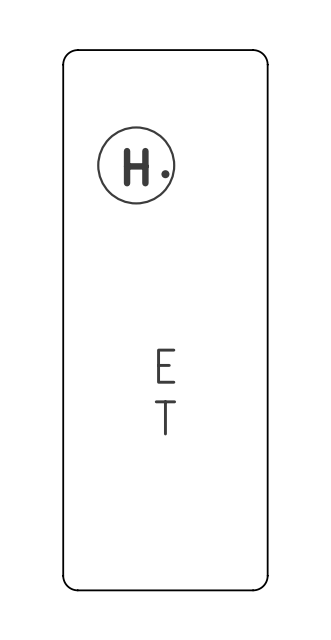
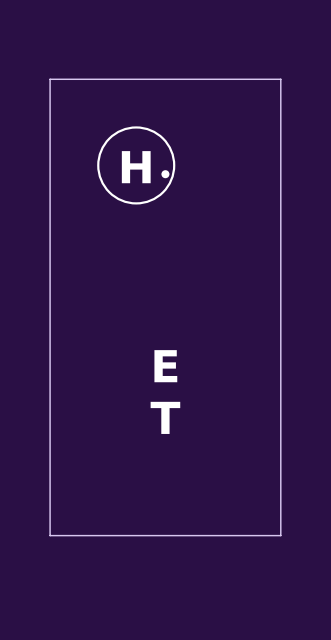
board edge: (77, 50) (253, 50) (262, 53) (266, 59) (267, 575) (264, 584) (257, 589) (77, 590) (68, 587) (64, 580) (63, 64) (67, 54) (77, 50) -> (50, 79) (50, 535) (280, 535) (280, 79) (50, 79)

